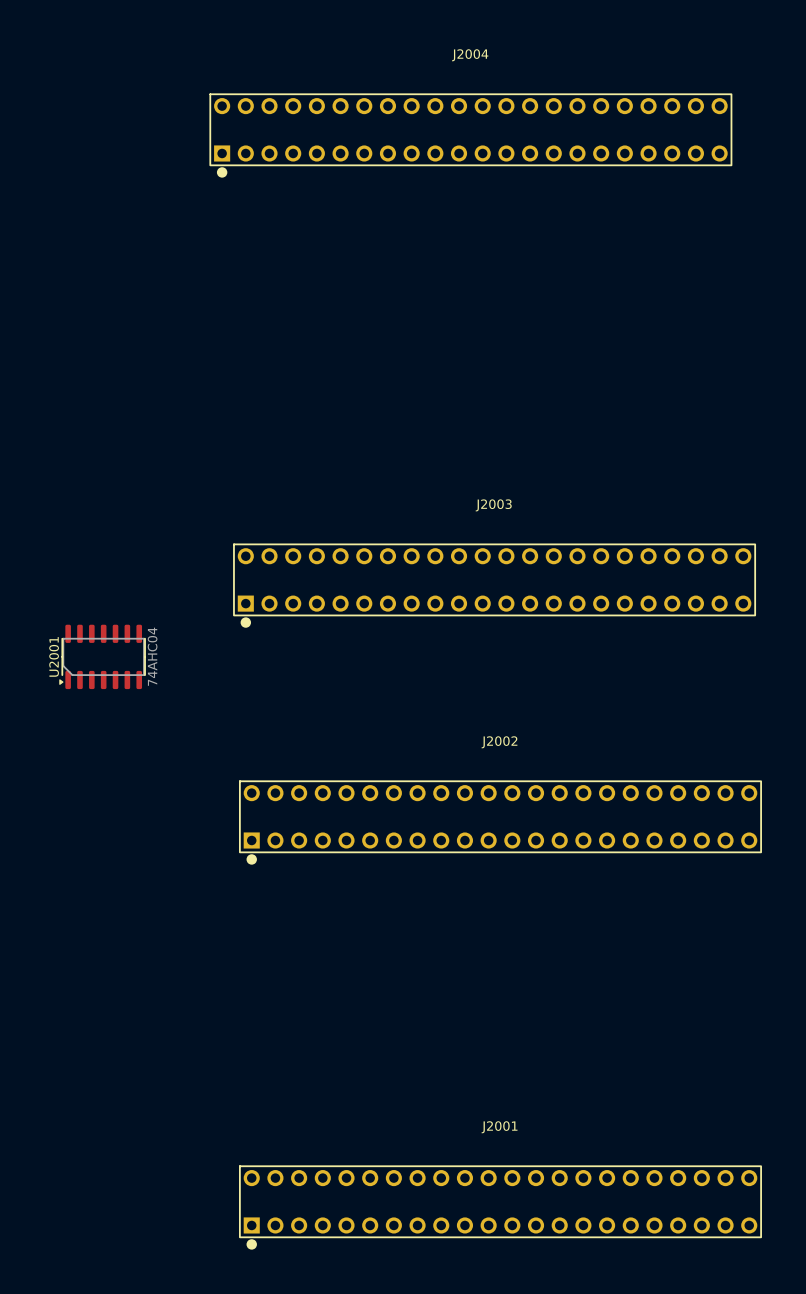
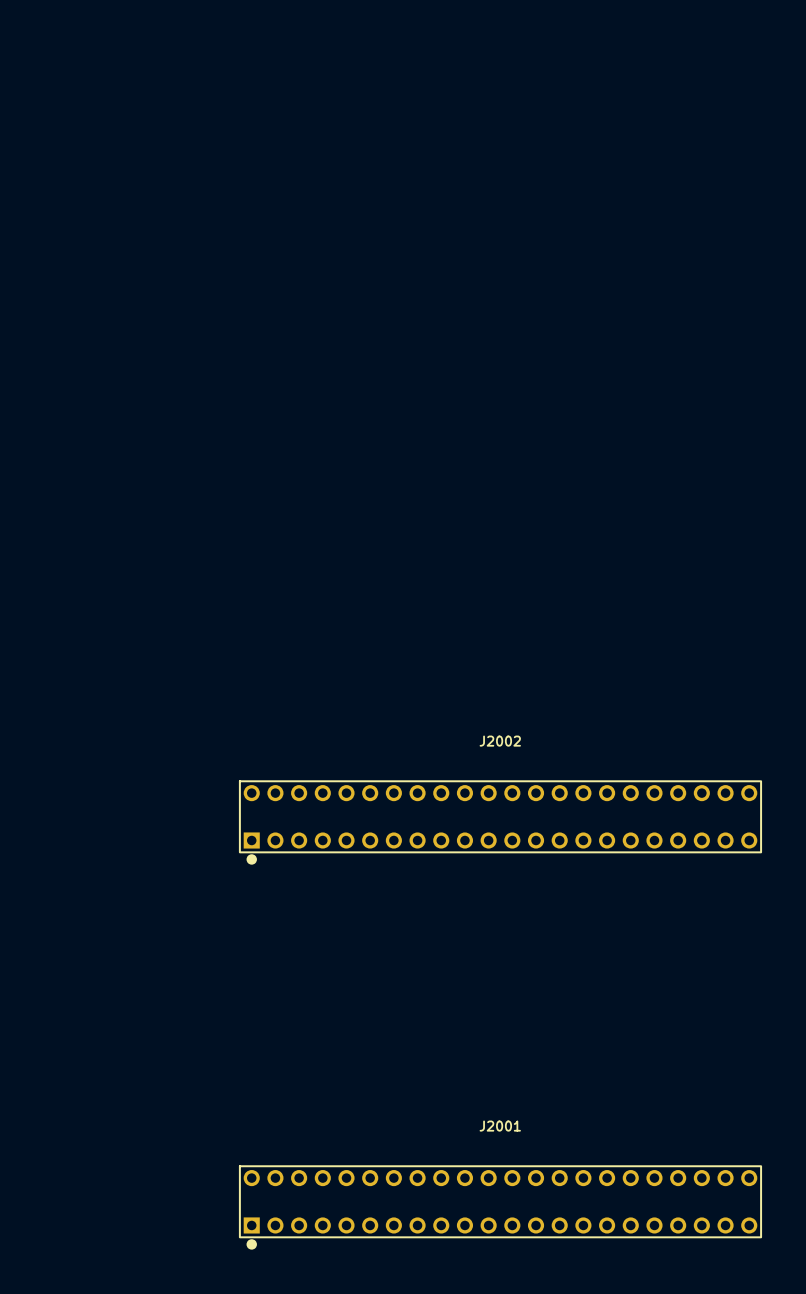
J2004: (470, 135) -> none
J2003: (494, 585) -> none
U2001: 74AHC04 (102, 656) -> none

